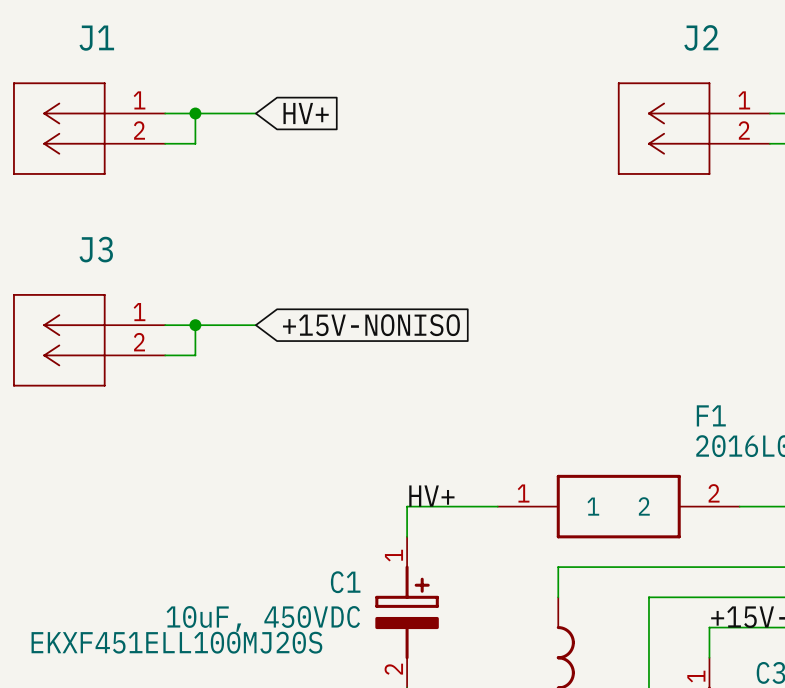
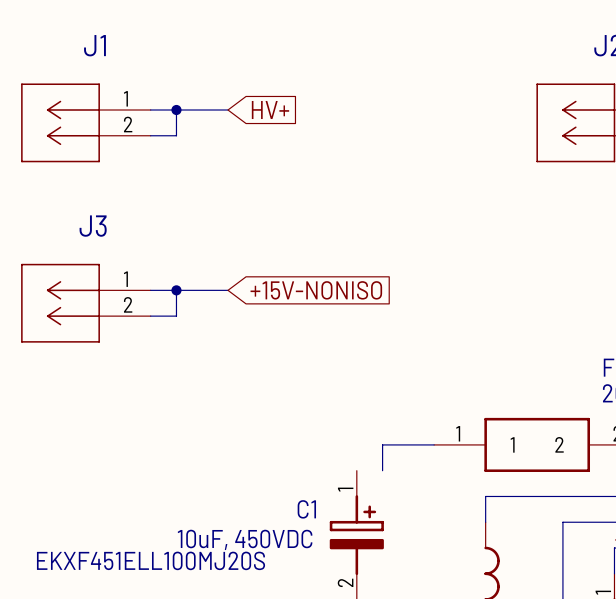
label: HV+ (431, 496) -> none
wire: (437, 506) (407, 506) (407, 536) -> (382, 444) (382, 470)
text position: 10uF, 450VDC (263, 618) -> 10uF, 450VDC (245, 539)

